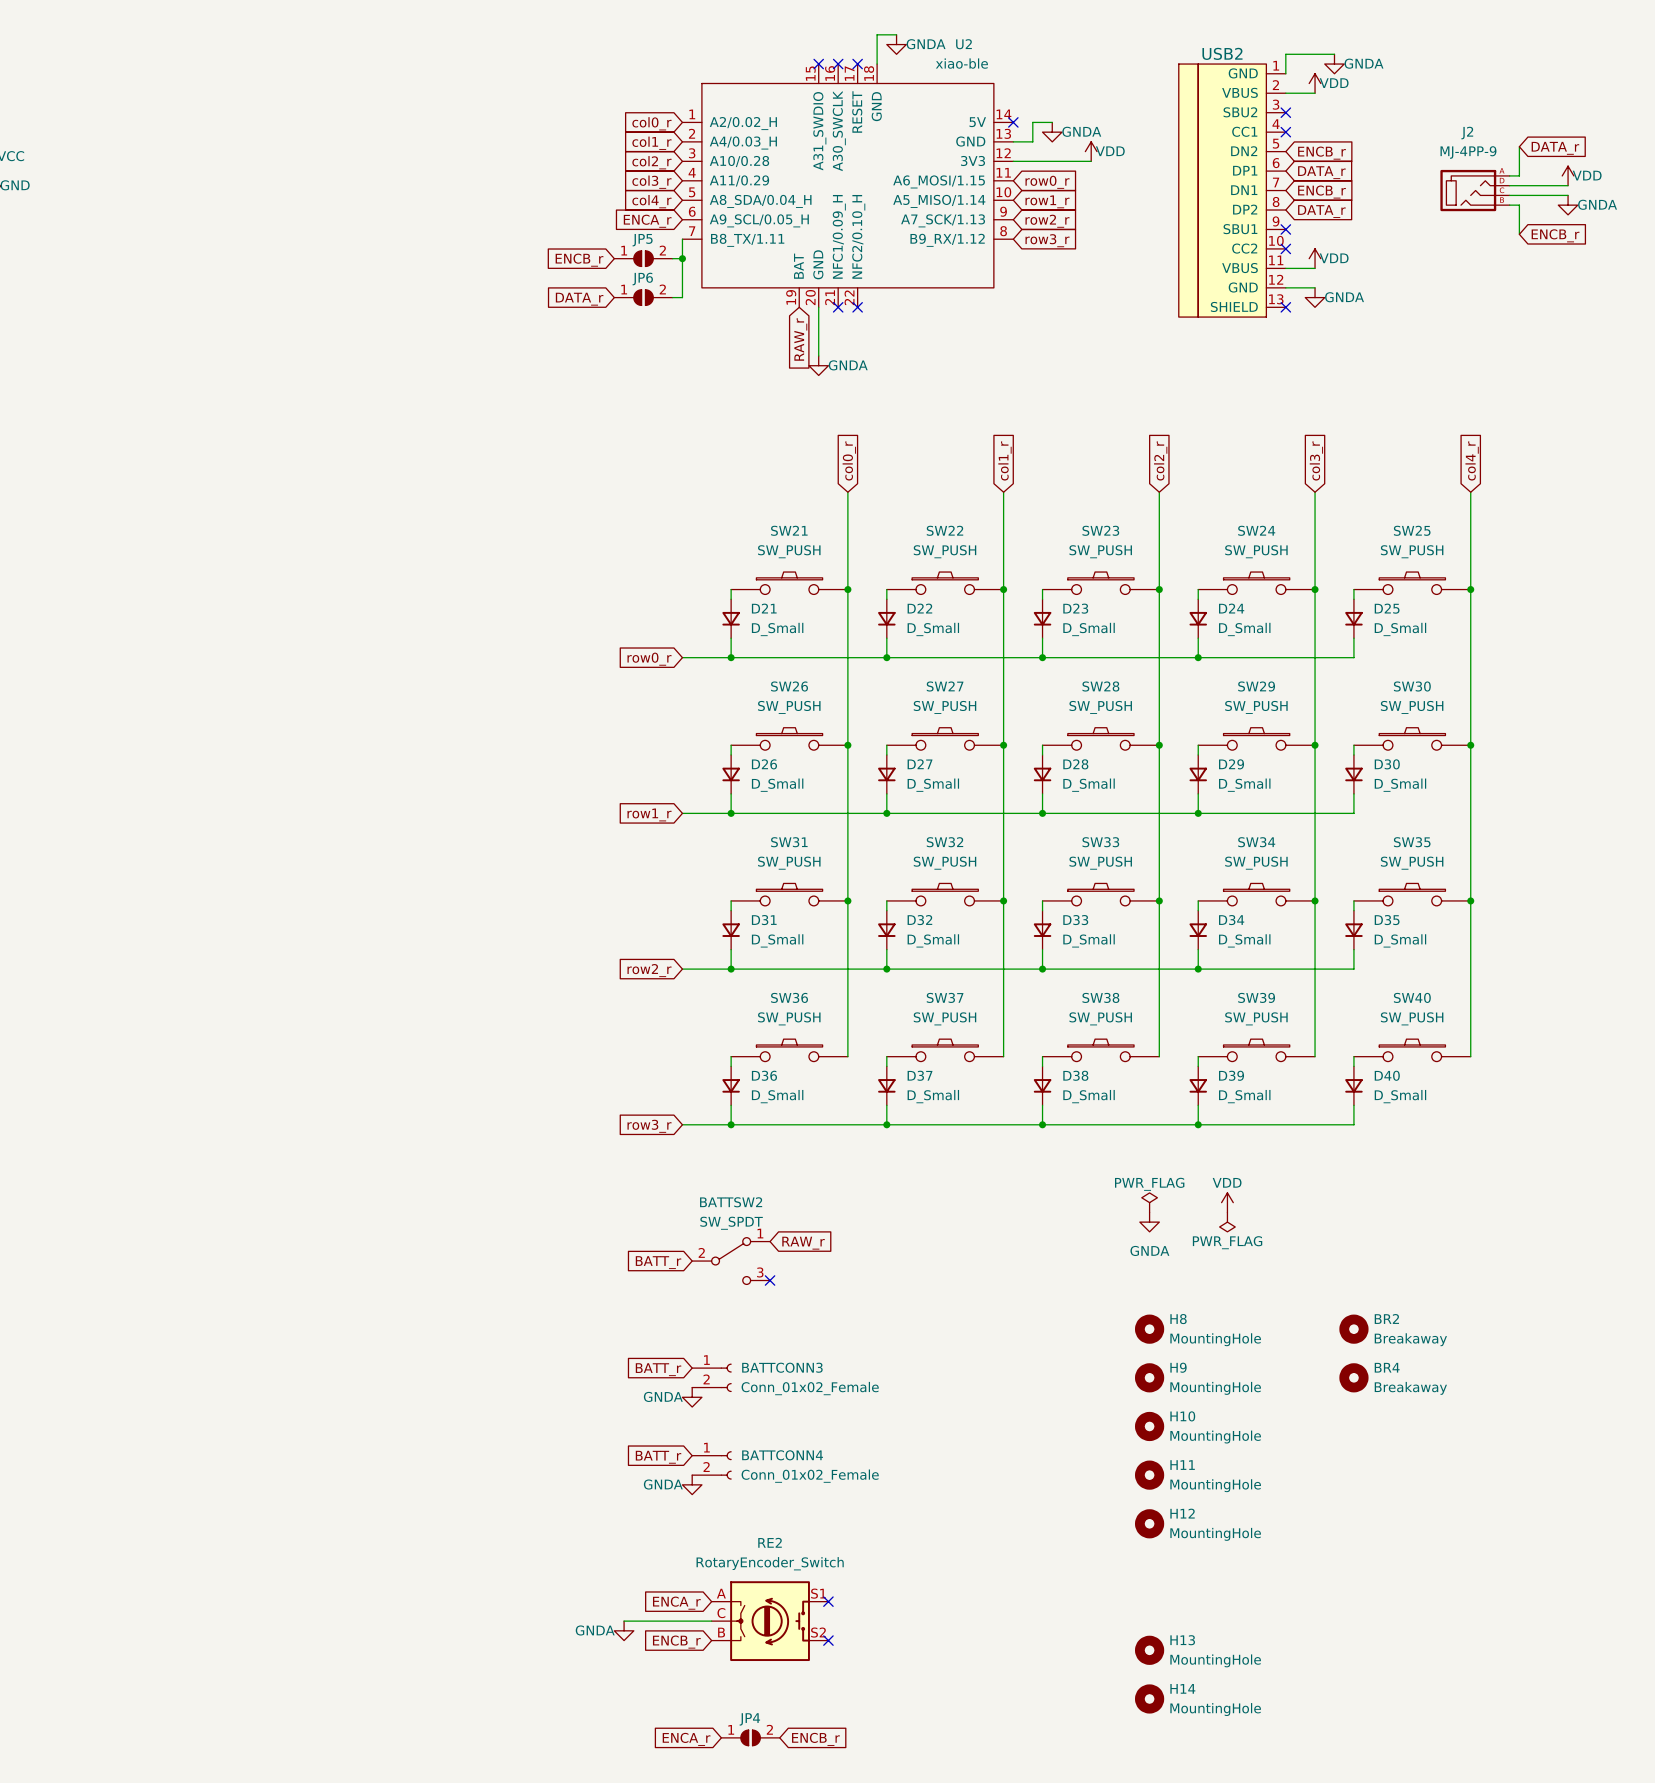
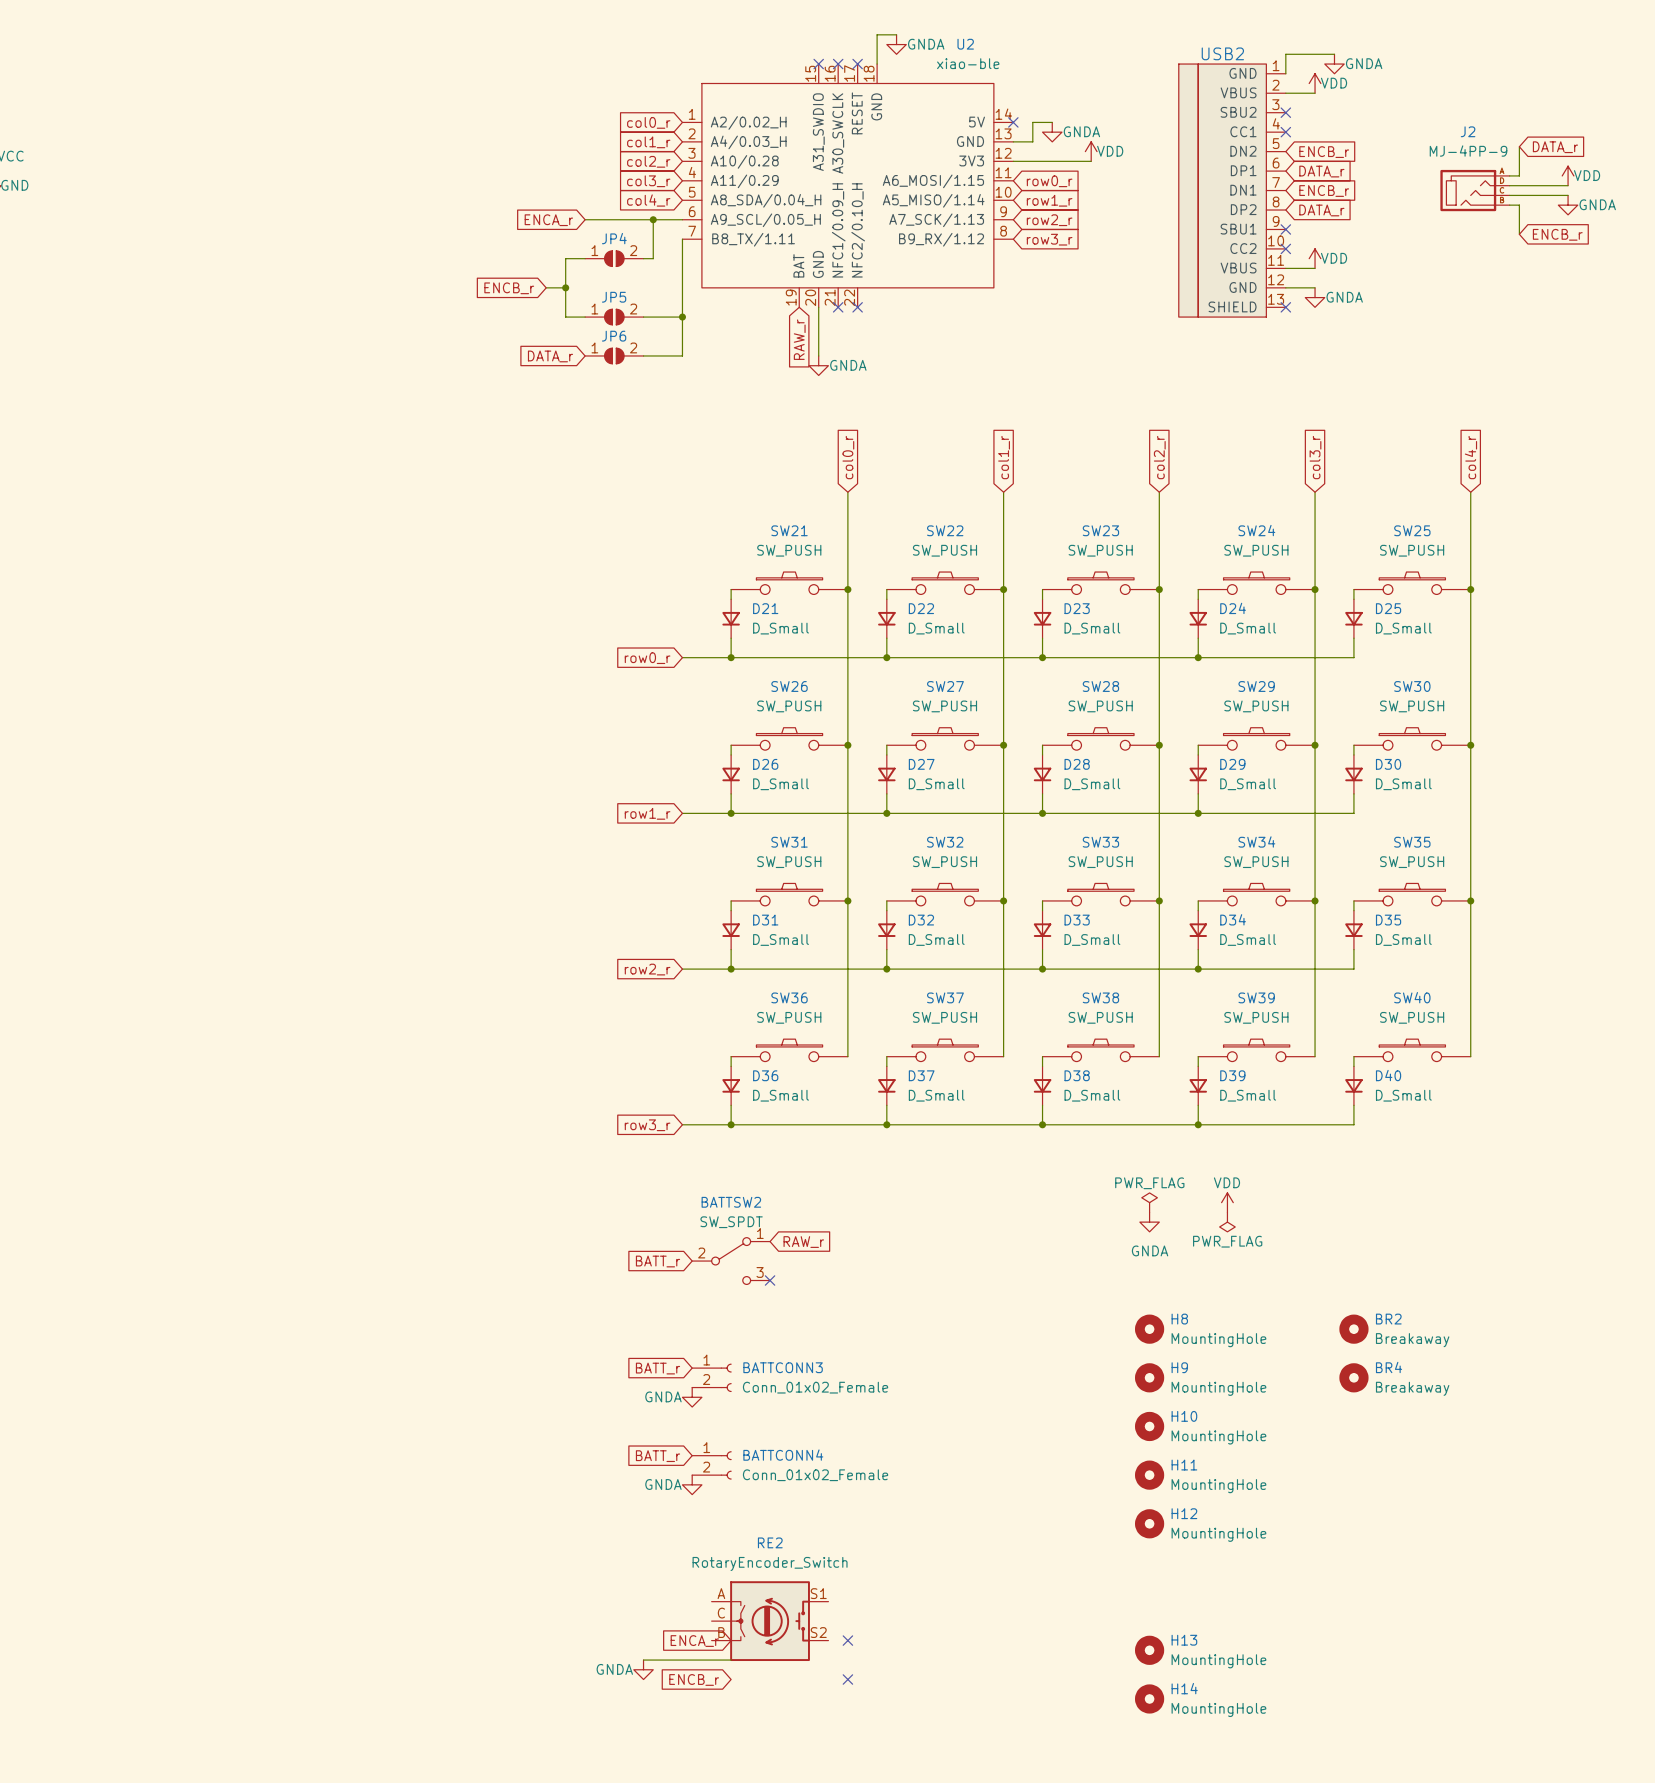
wire: none -> (585, 219) (682, 219)
wire: none -> (653, 219) (653, 258) (643, 258)
junction: none -> (653, 219)
global label position: ENCA_r (647, 221) -> ENCA_r (548, 220)
wire: none -> (585, 258) (565, 258) (565, 317) (585, 317)
JP5 position: (643, 258) -> (614, 317)
wire: (672, 258) (682, 258) -> none
junction: (682, 258) -> none
global label position: ENCB_r (579, 260) -> ENCB_r (509, 288)
junction: none -> (565, 287)
JP6 position: (643, 297) -> (614, 355)
wire: (672, 297) (682, 297) -> (643, 355) (682, 355) (682, 297)
global label position: DATA_r (579, 299) -> DATA_r (550, 356)
wire: none -> (643, 317) (682, 317)
junction: none -> (682, 317)
no-connect mark: (828, 1601) -> none
global label position: ENCA_r (676, 1603) -> ENCA_r (694, 1641)
wire: (624, 1621) (711, 1621) -> (643, 1660) (731, 1660)
power symbol position: GNDA (624, 1630) -> GNDA (643, 1669)
no-connect mark position: (828, 1640) -> (847, 1640)
global label: ENCB_r (676, 1642) -> none
no-connect mark: none -> (847, 1679)
global label: none -> ENCB_r (694, 1679)
JP4 position: (750, 1737) -> (614, 258)
global label: ENCA_r (686, 1739) -> none
global label: ENCB_r (815, 1739) -> none

